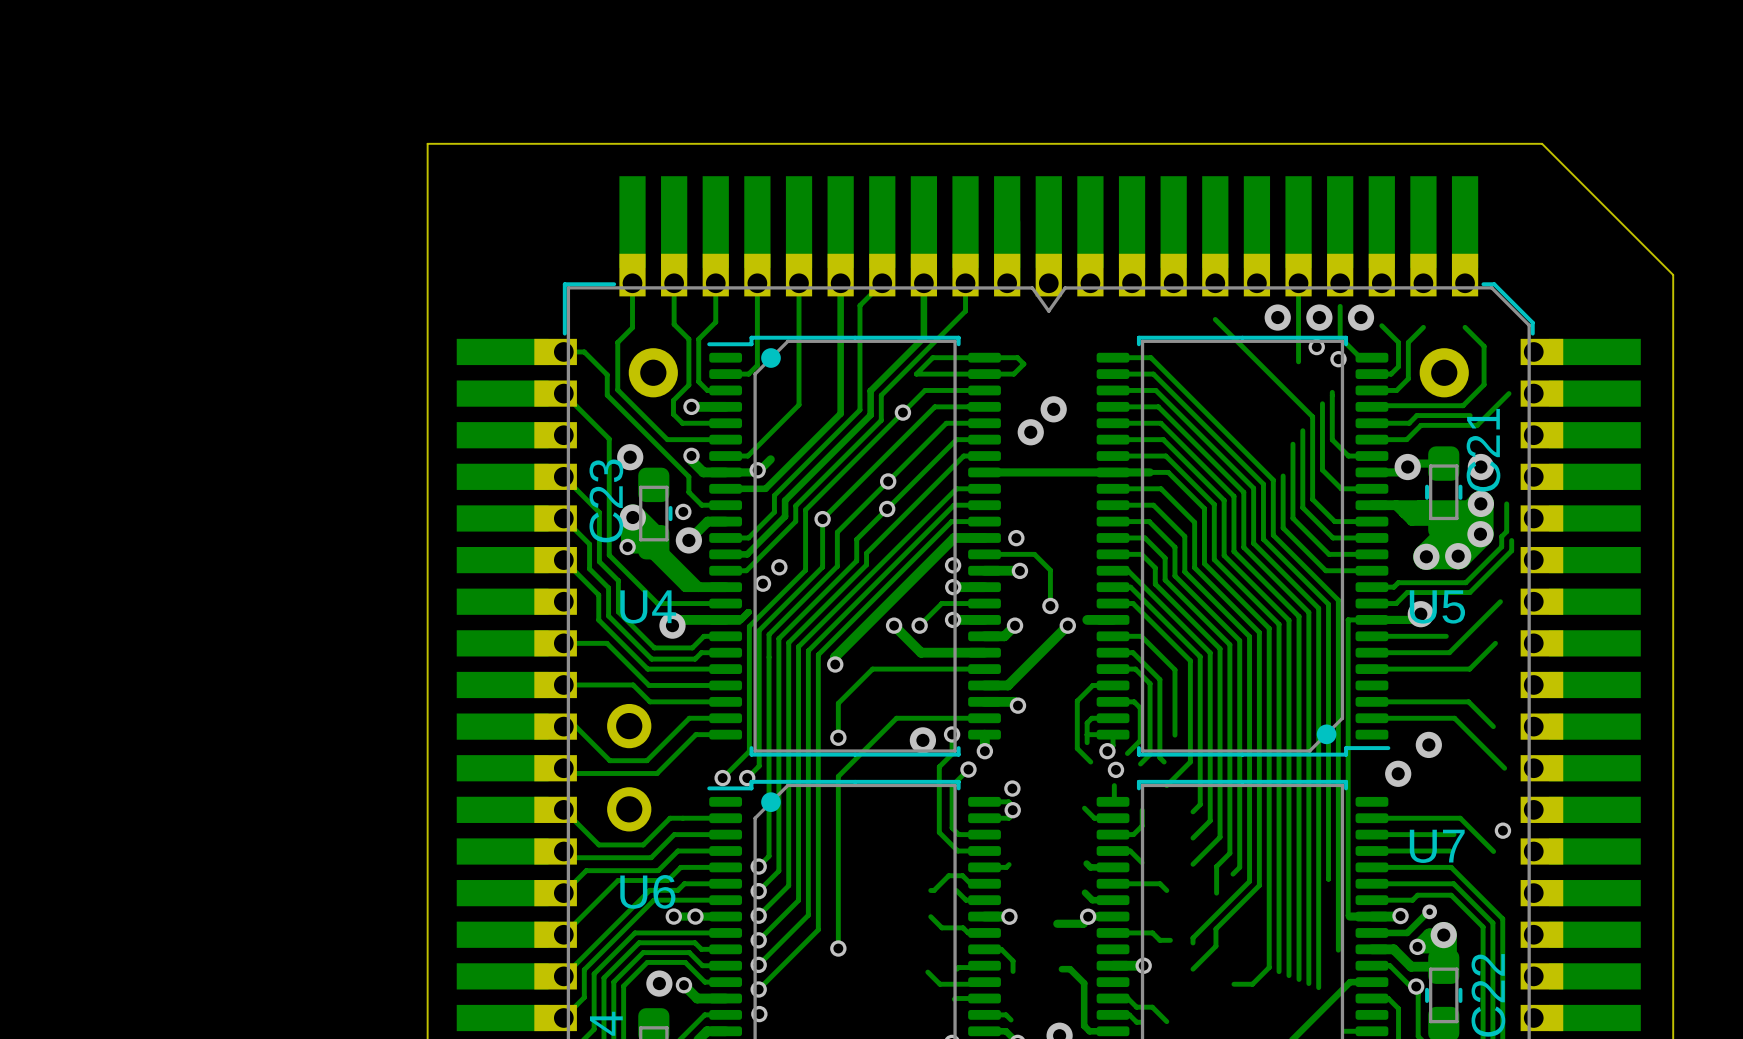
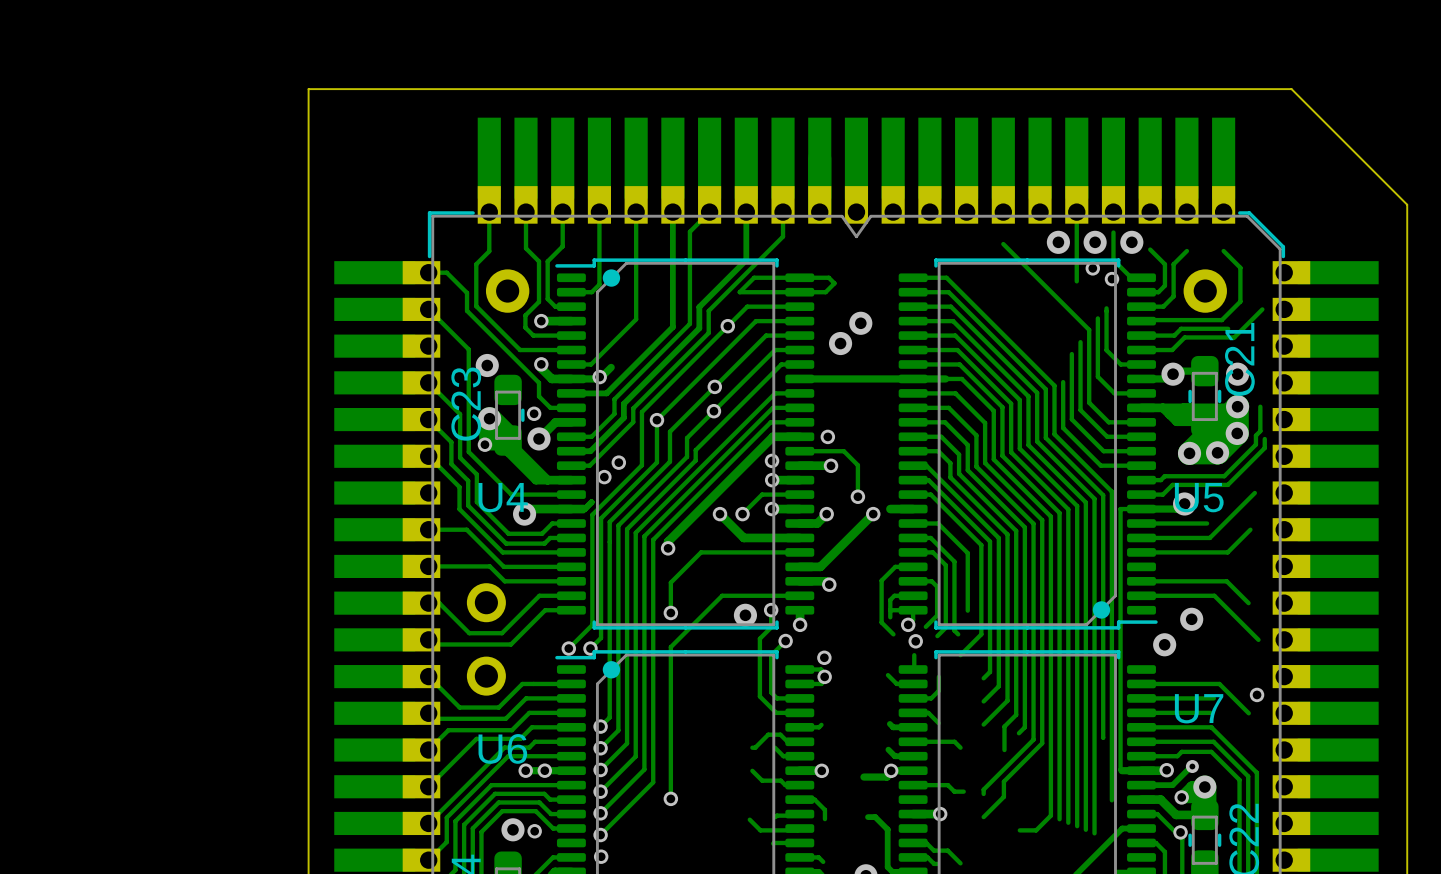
track: (683, 985) (697, 998) (725, 998) -> none

